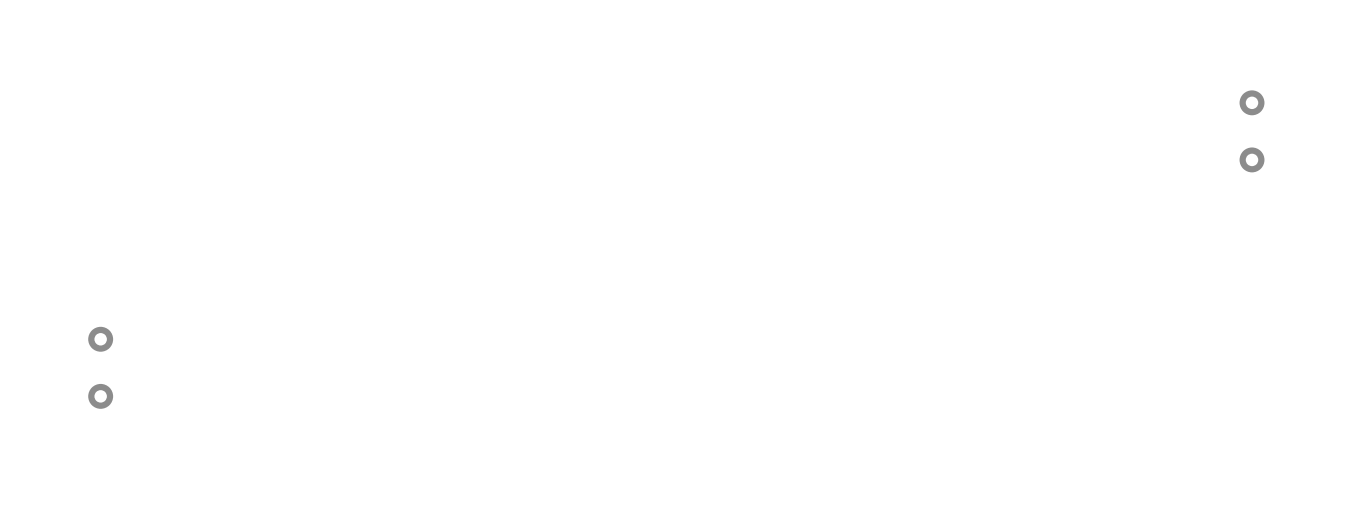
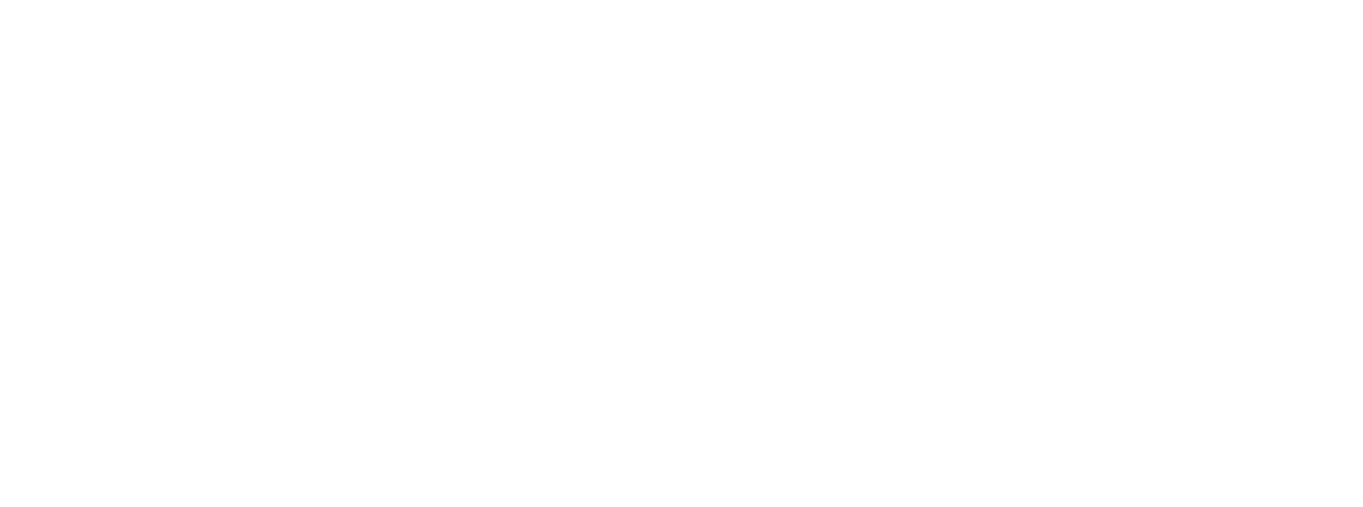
part: (1252, 102) -> none
part: (1252, 159) -> none
part: (100, 339) -> none
part: (100, 396) -> none

